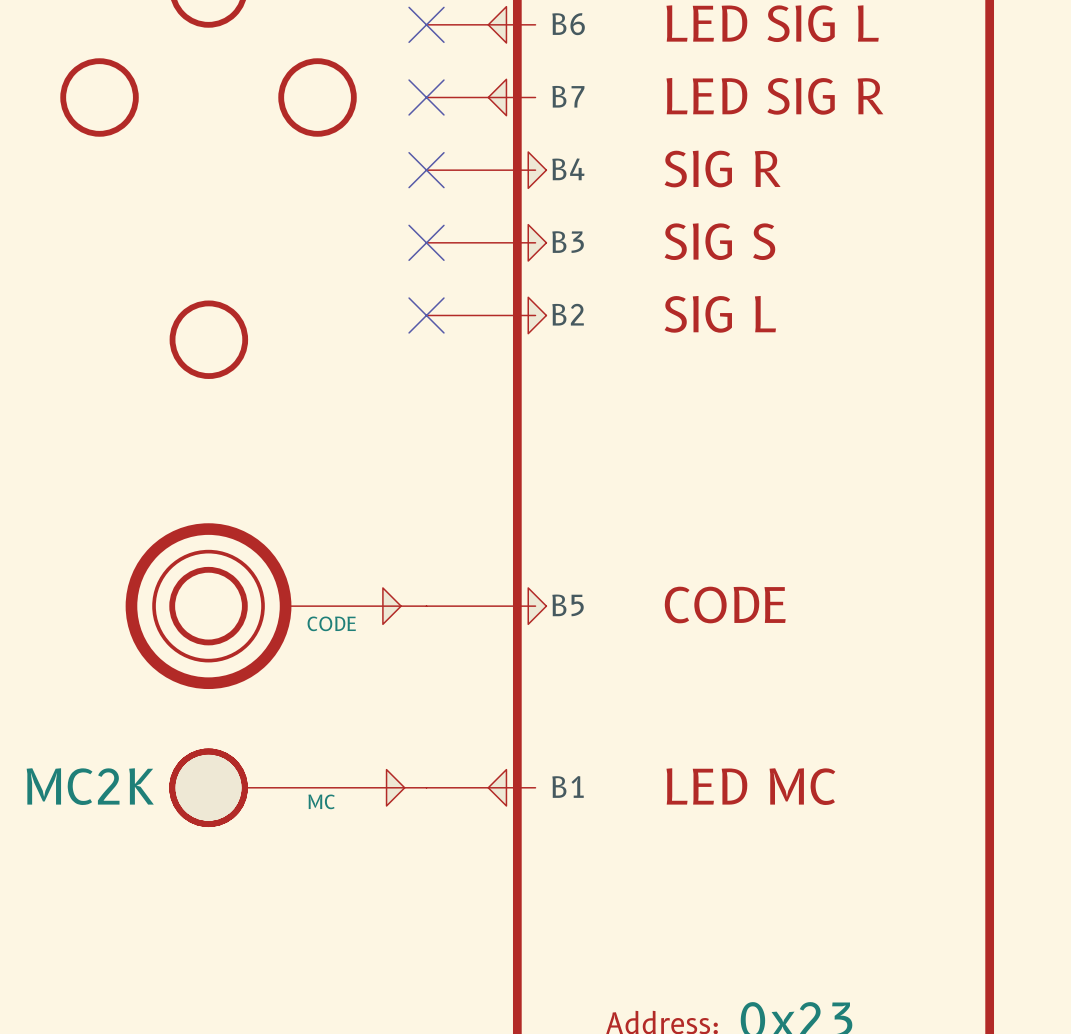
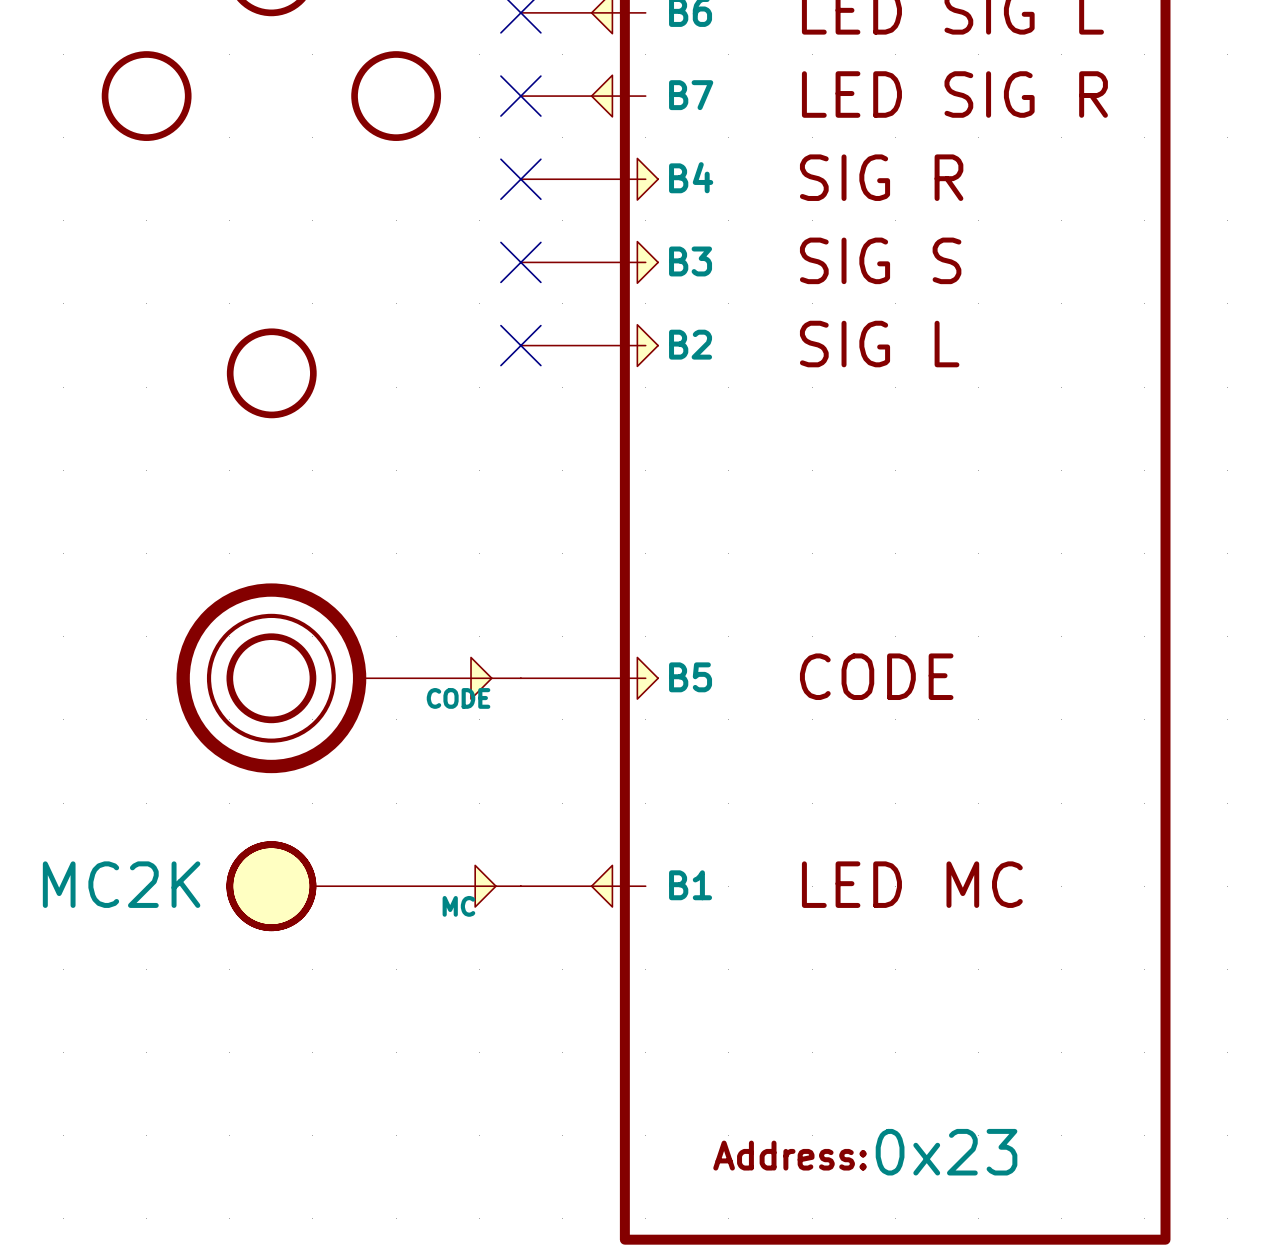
part value position: CODE (331, 623) -> CODE (458, 698)
part value position: MC (321, 801) -> MC (458, 906)

